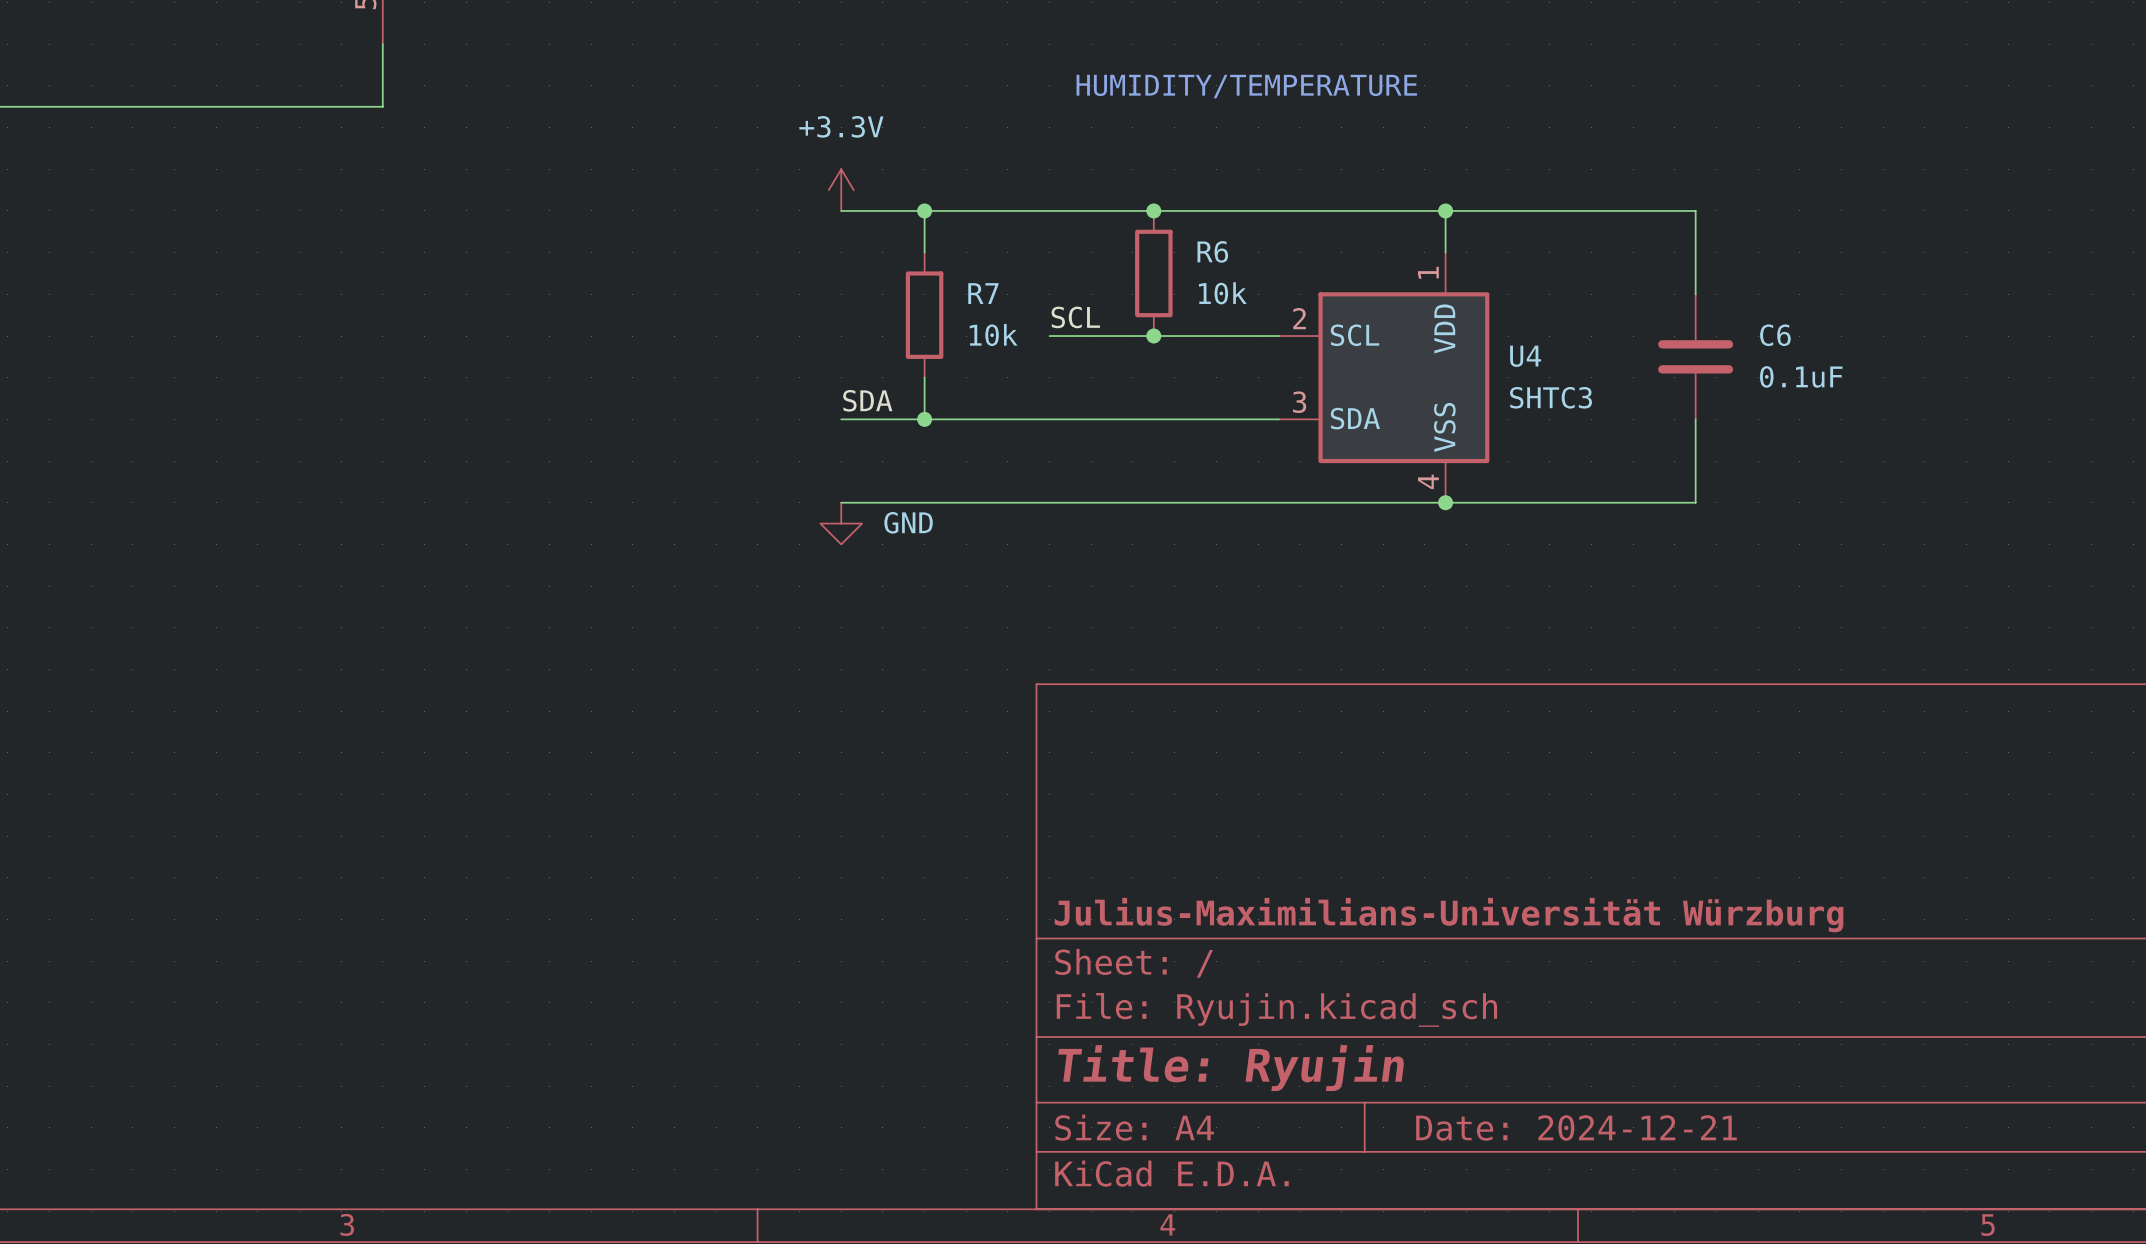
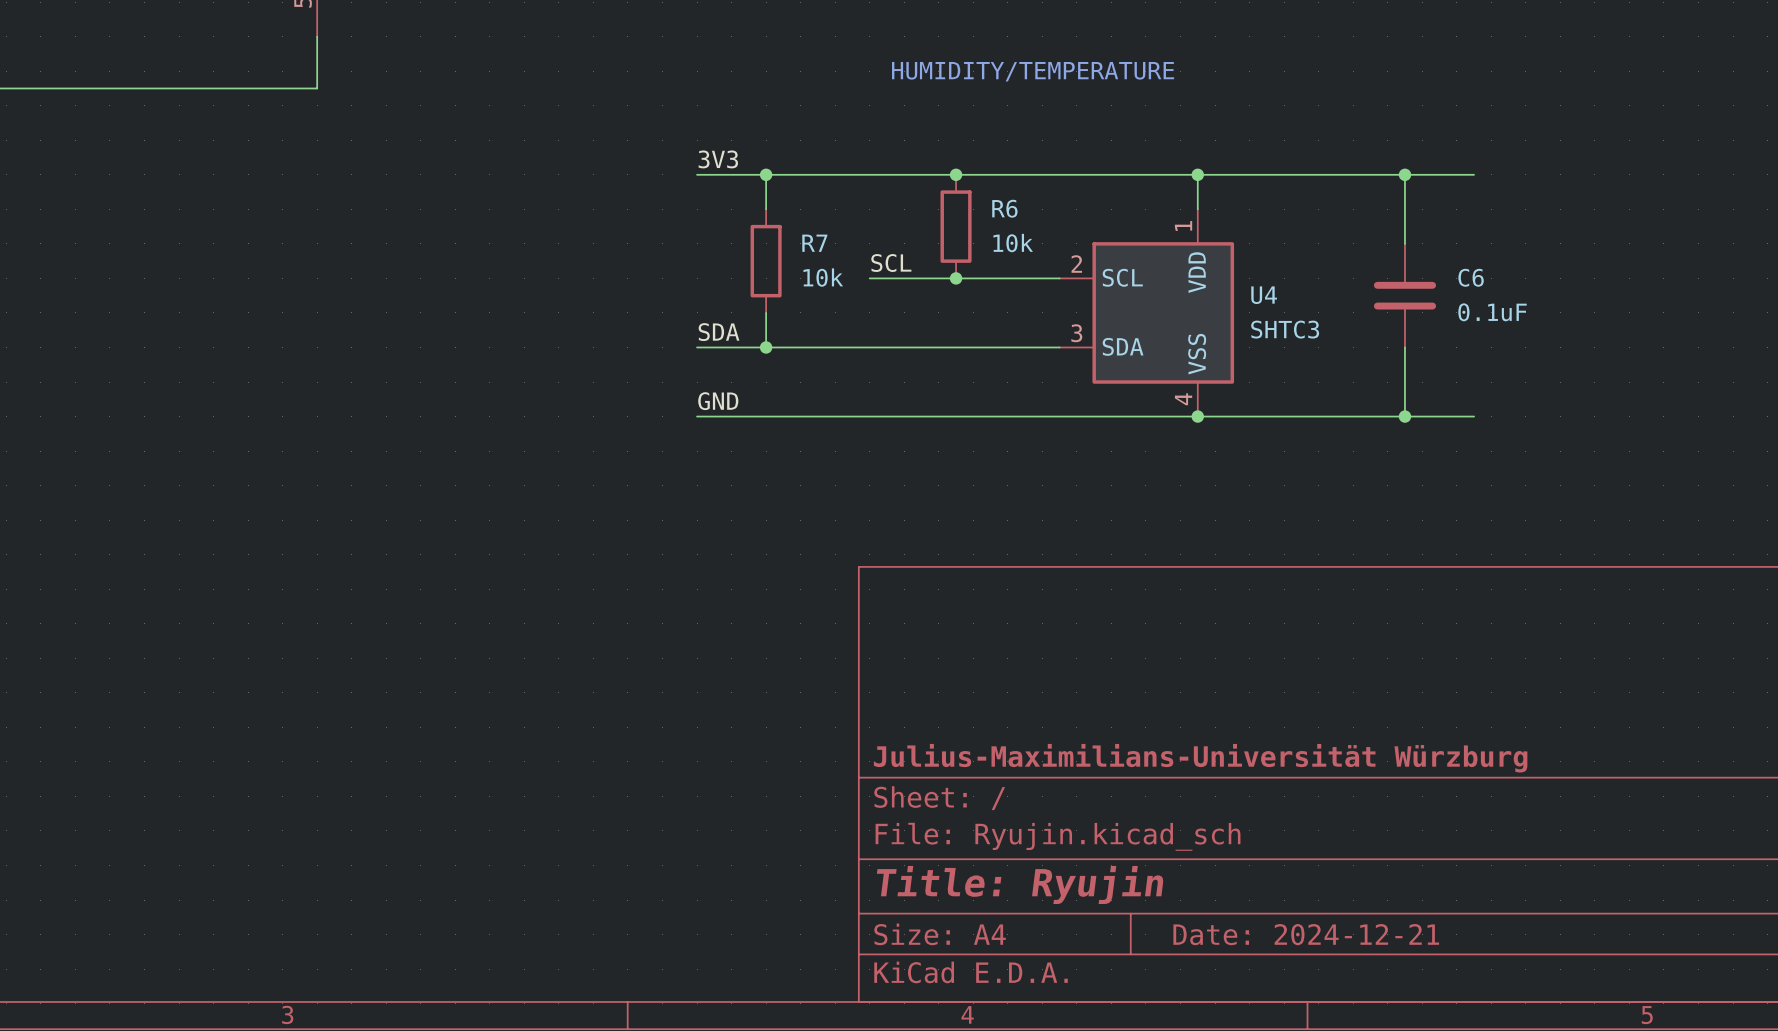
power symbol: +3.3V (841, 190) -> none
label: none -> 3V3 (718, 159)
wire: none -> (1404, 174) (1474, 174)
junction: none -> (1404, 174)
label: none -> GND (718, 401)
wire: none -> (1404, 416) (1474, 416)
junction: none -> (1404, 416)
power symbol: GND (841, 523) -> none

